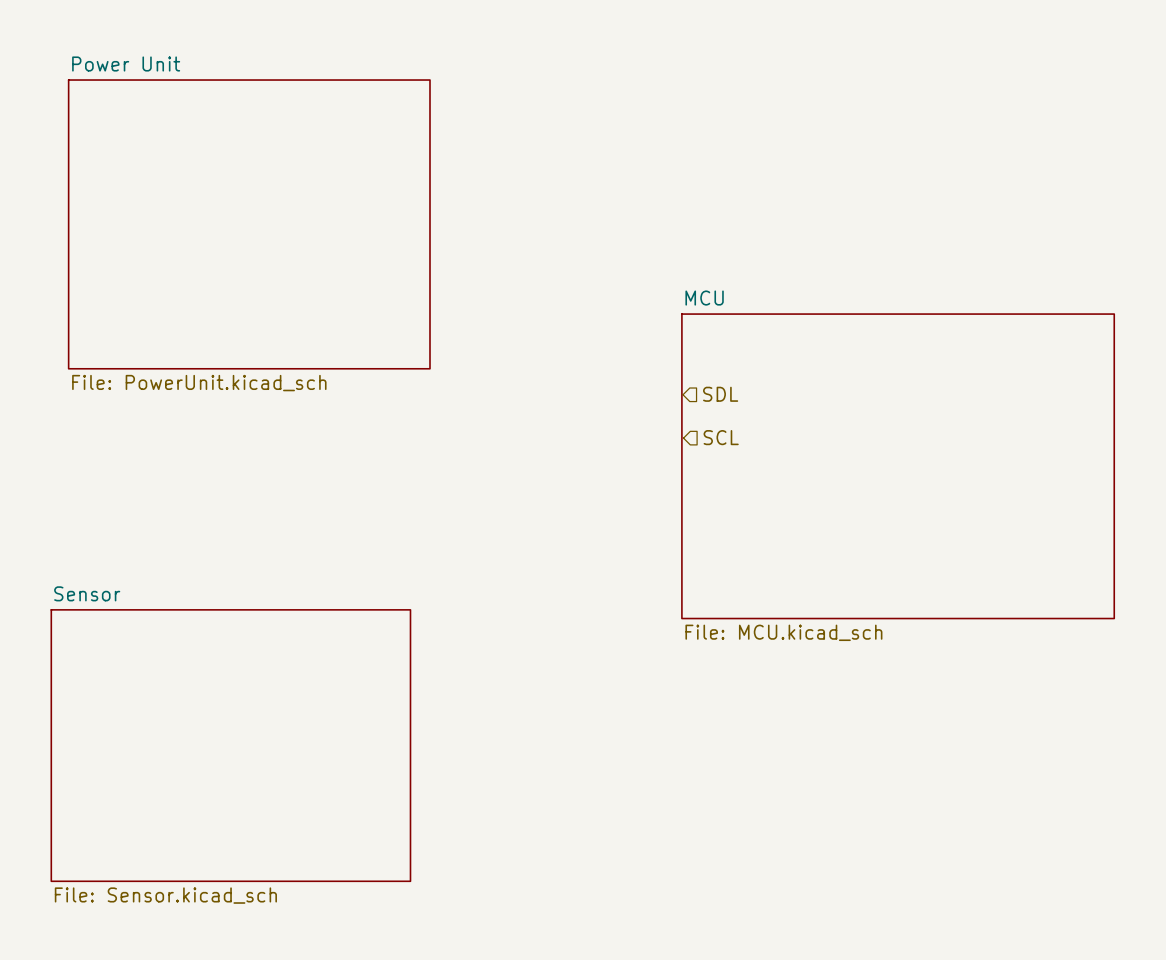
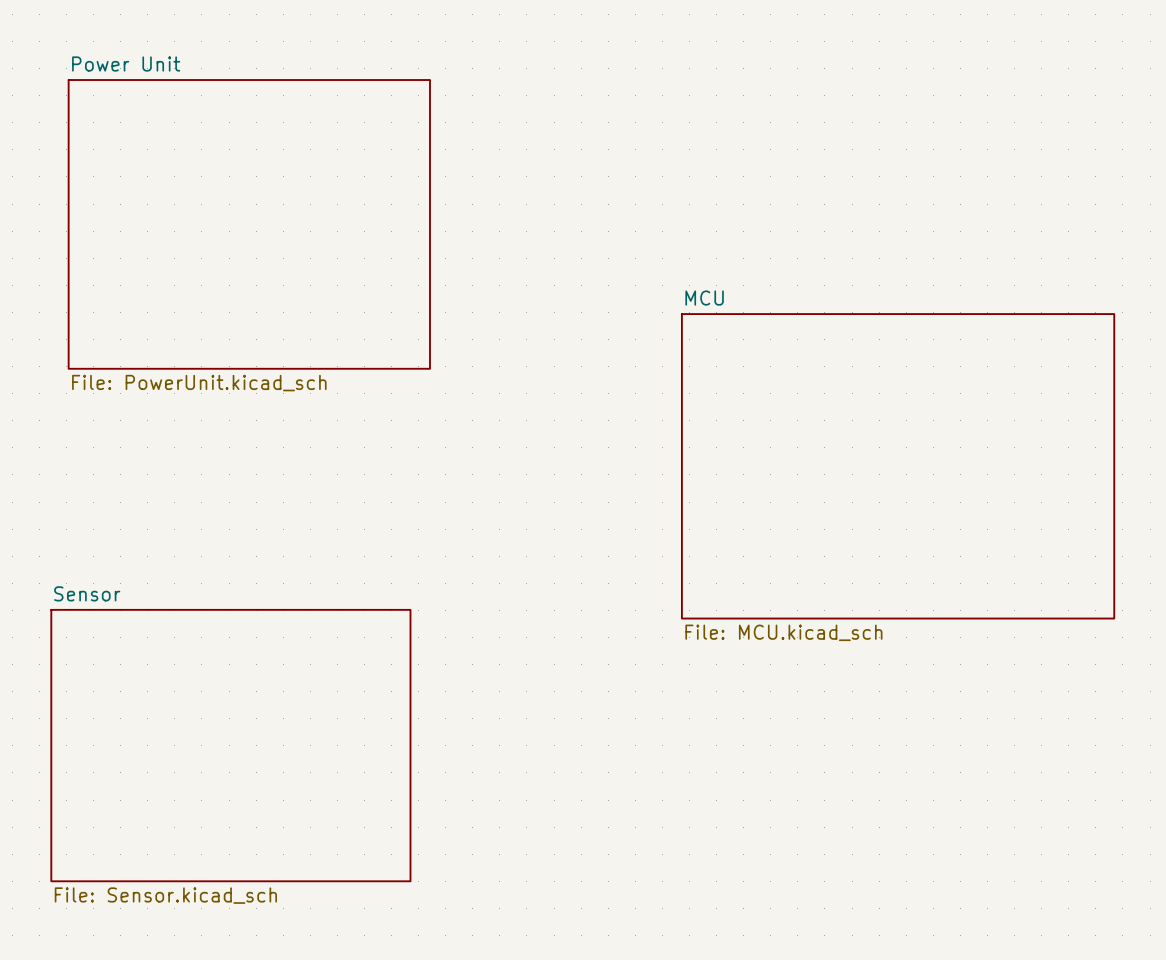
hierarchical label: SDL (720, 394) -> none
hierarchical label: SCL (721, 437) -> none

